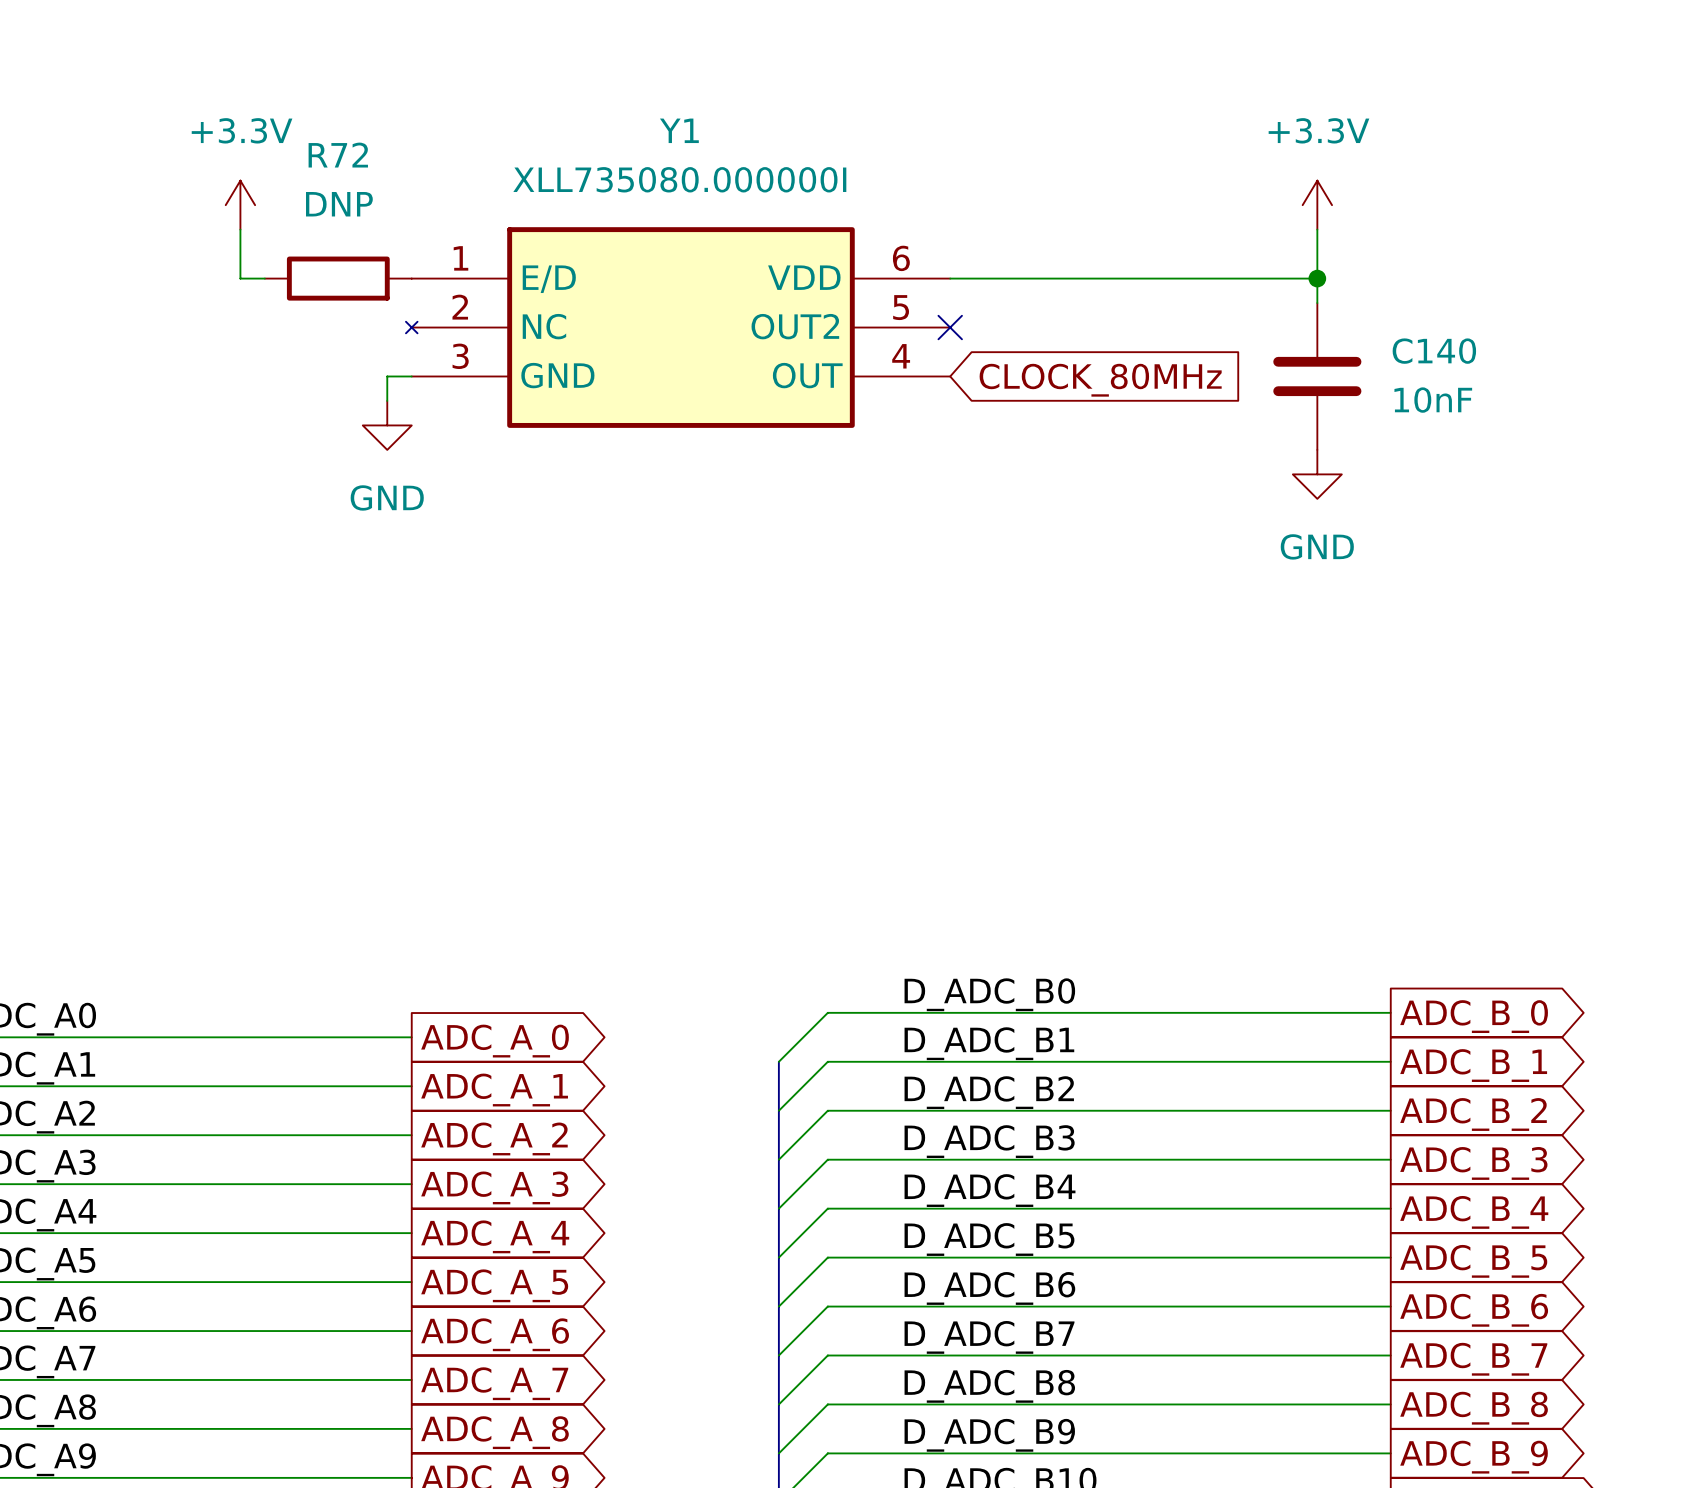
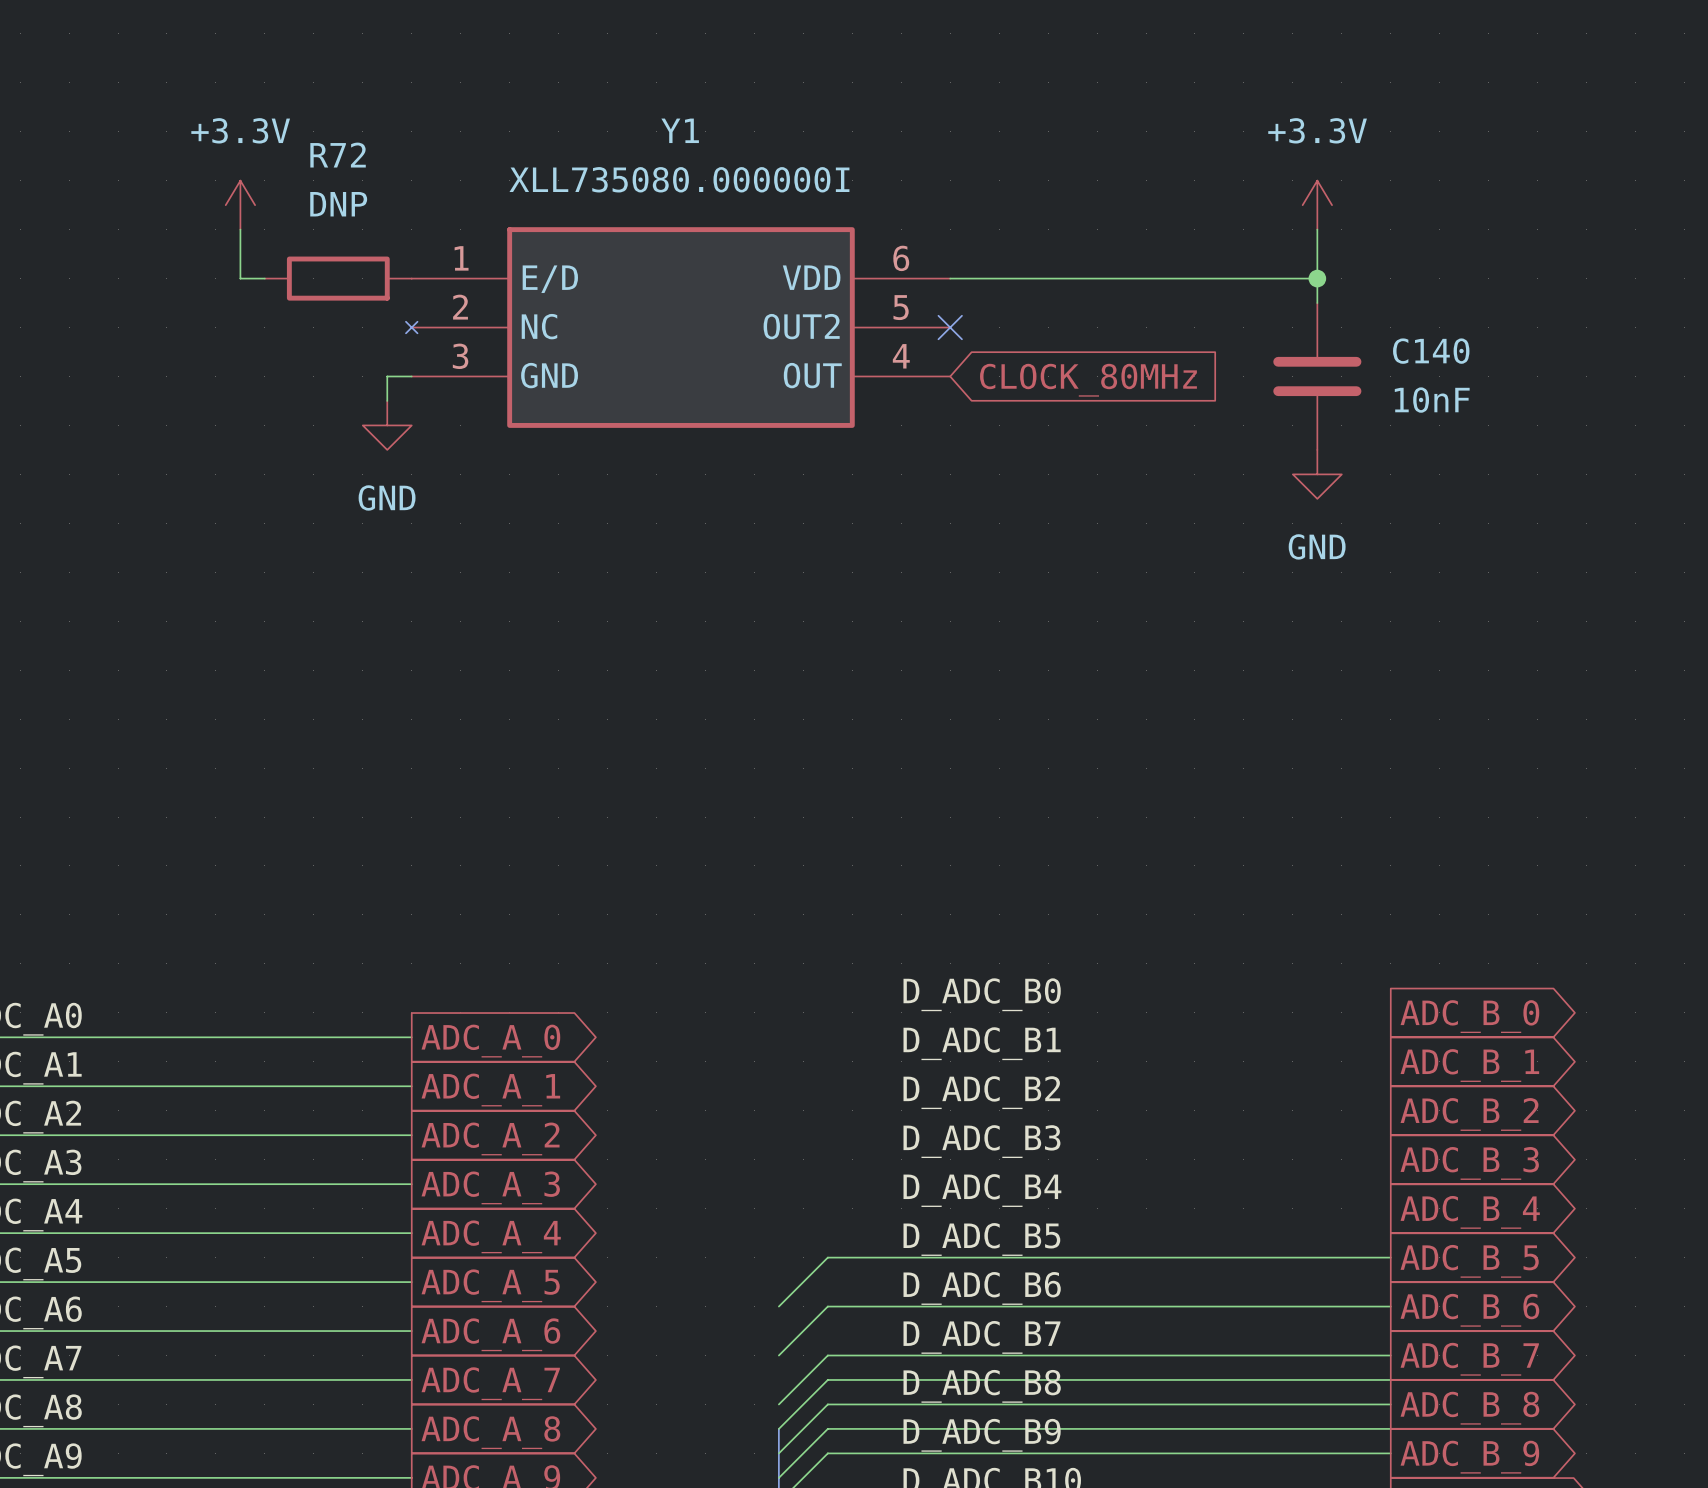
wire: (1390, 1012) (827, 1012) (778, 1061) -> none
bus: (778, 1061) (778, 1428) -> none
wire: (1390, 1061) (827, 1061) (778, 1110) -> none
wire: (1390, 1110) (827, 1110) (778, 1159) -> none
wire: (1390, 1159) (827, 1159) (778, 1208) -> (1390, 1379) (827, 1379) (778, 1428)
wire: (1390, 1208) (827, 1208) (778, 1257) -> (1390, 1428) (827, 1428) (778, 1477)

